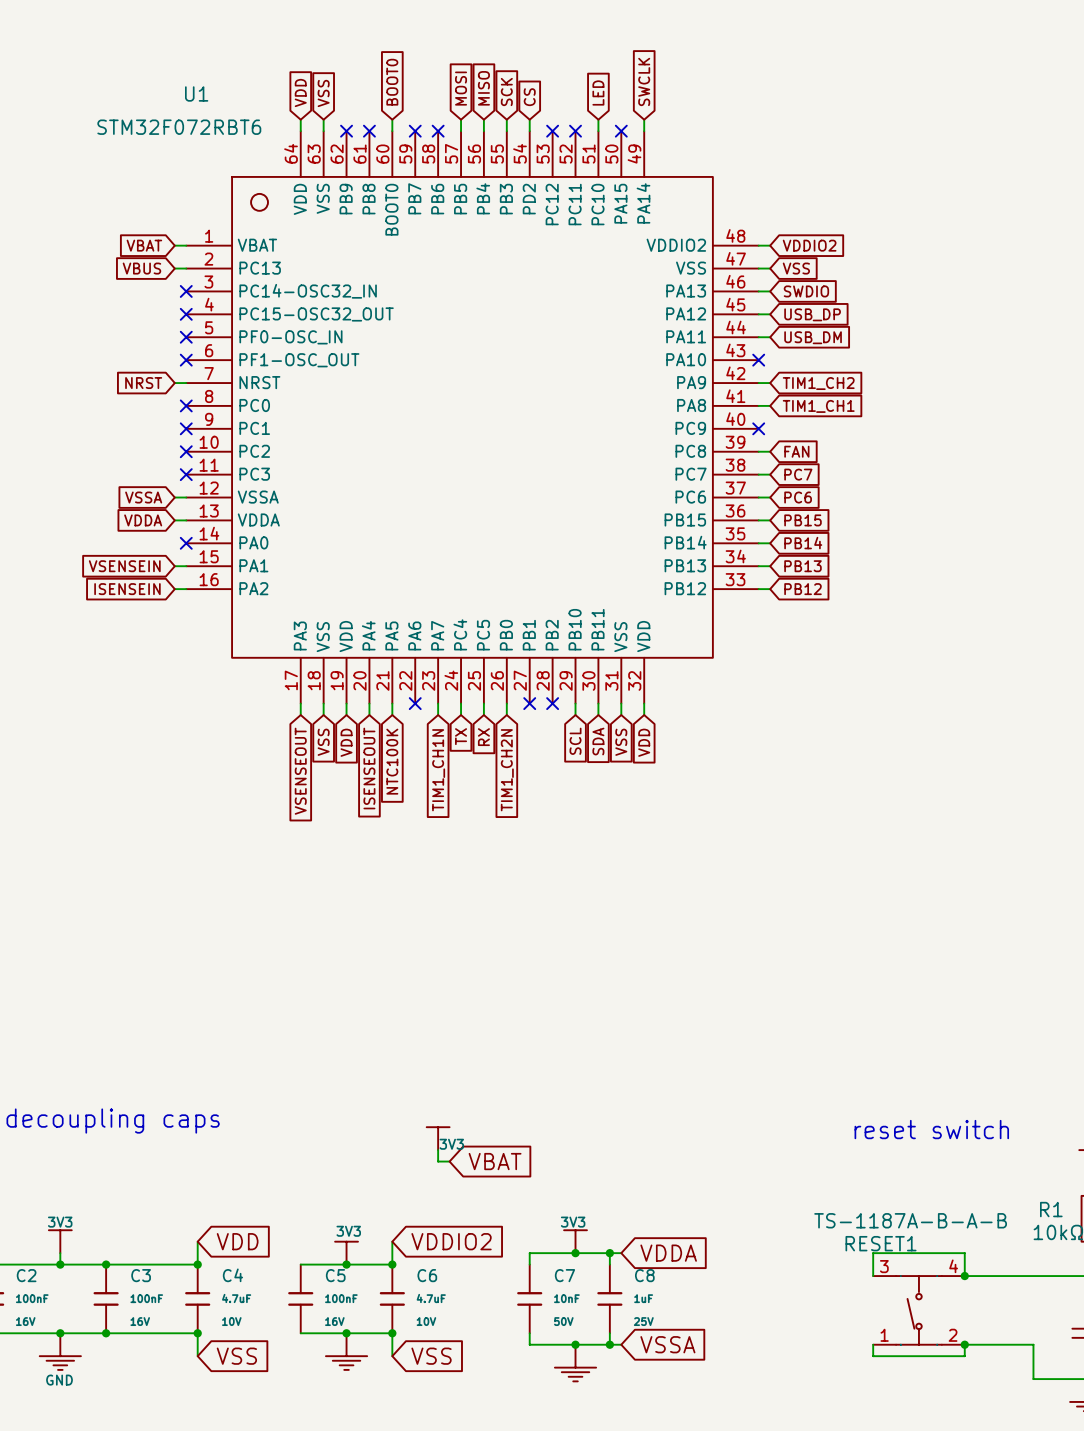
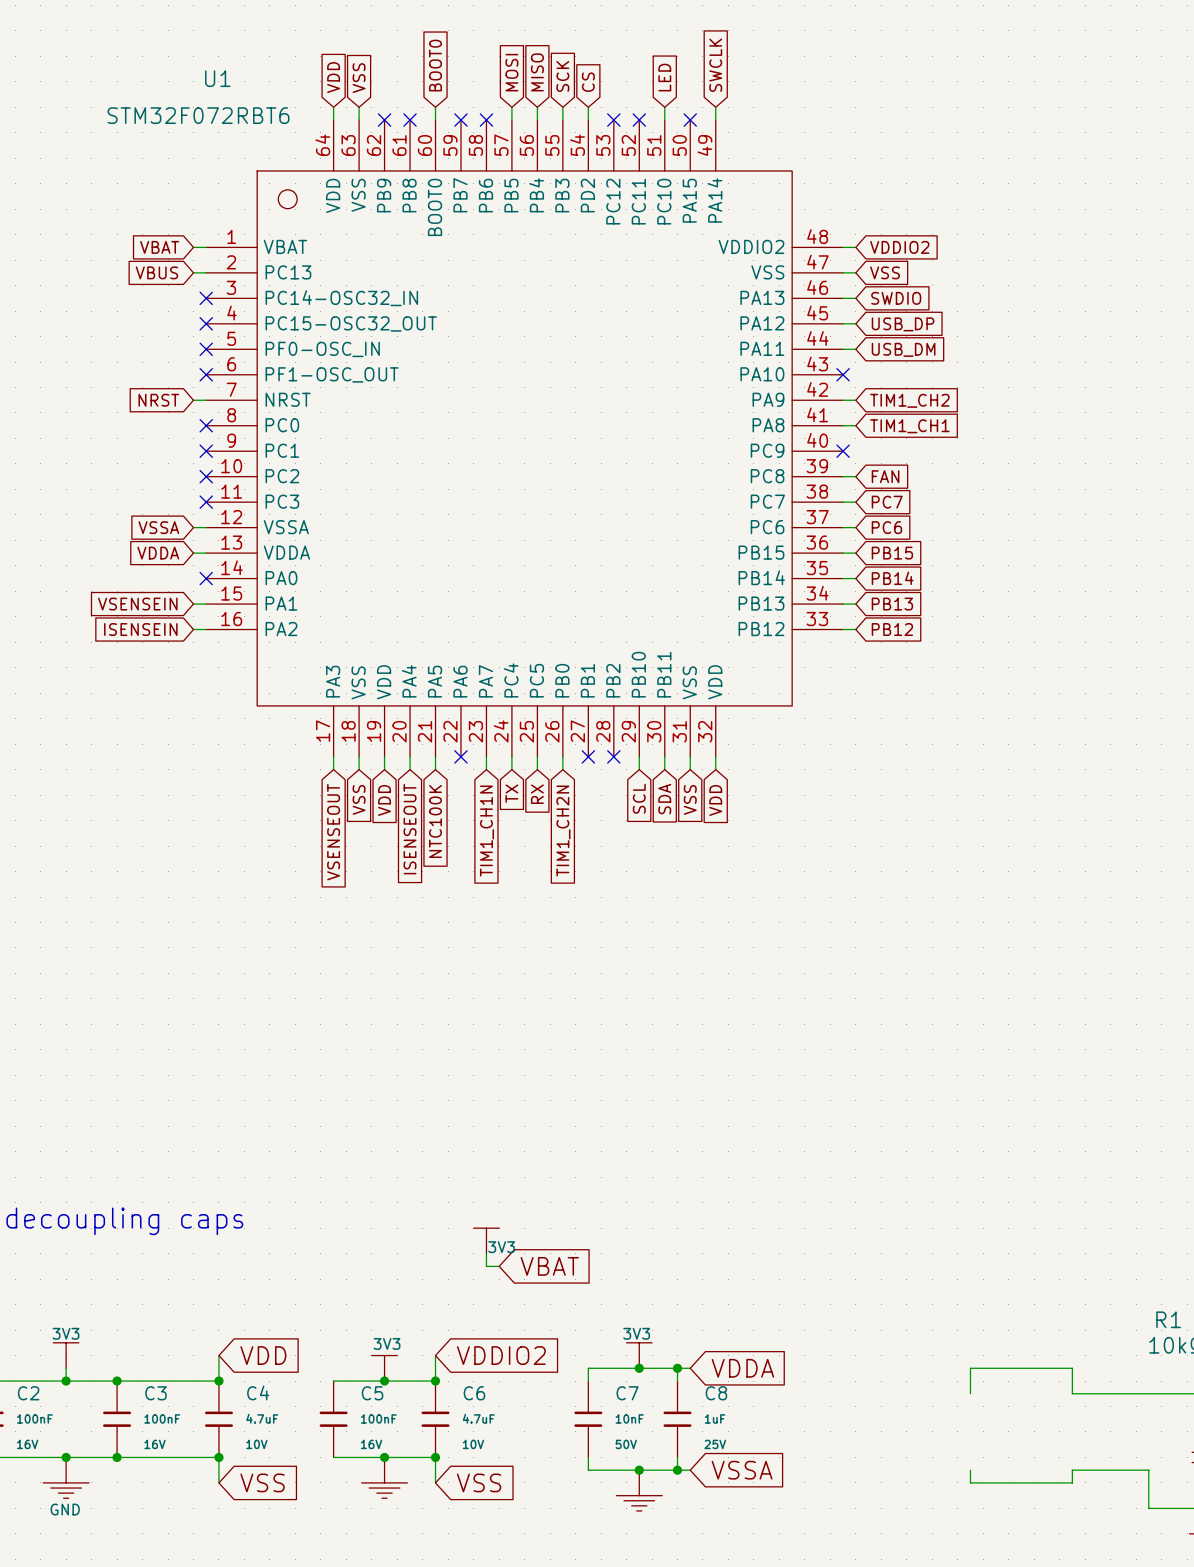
text: reset switch (931, 1129) -> none
junction: (964, 1276) -> none
RESET1: TS-1187A-B-A-B (918, 1310) -> none
junction: (964, 1344) -> none

